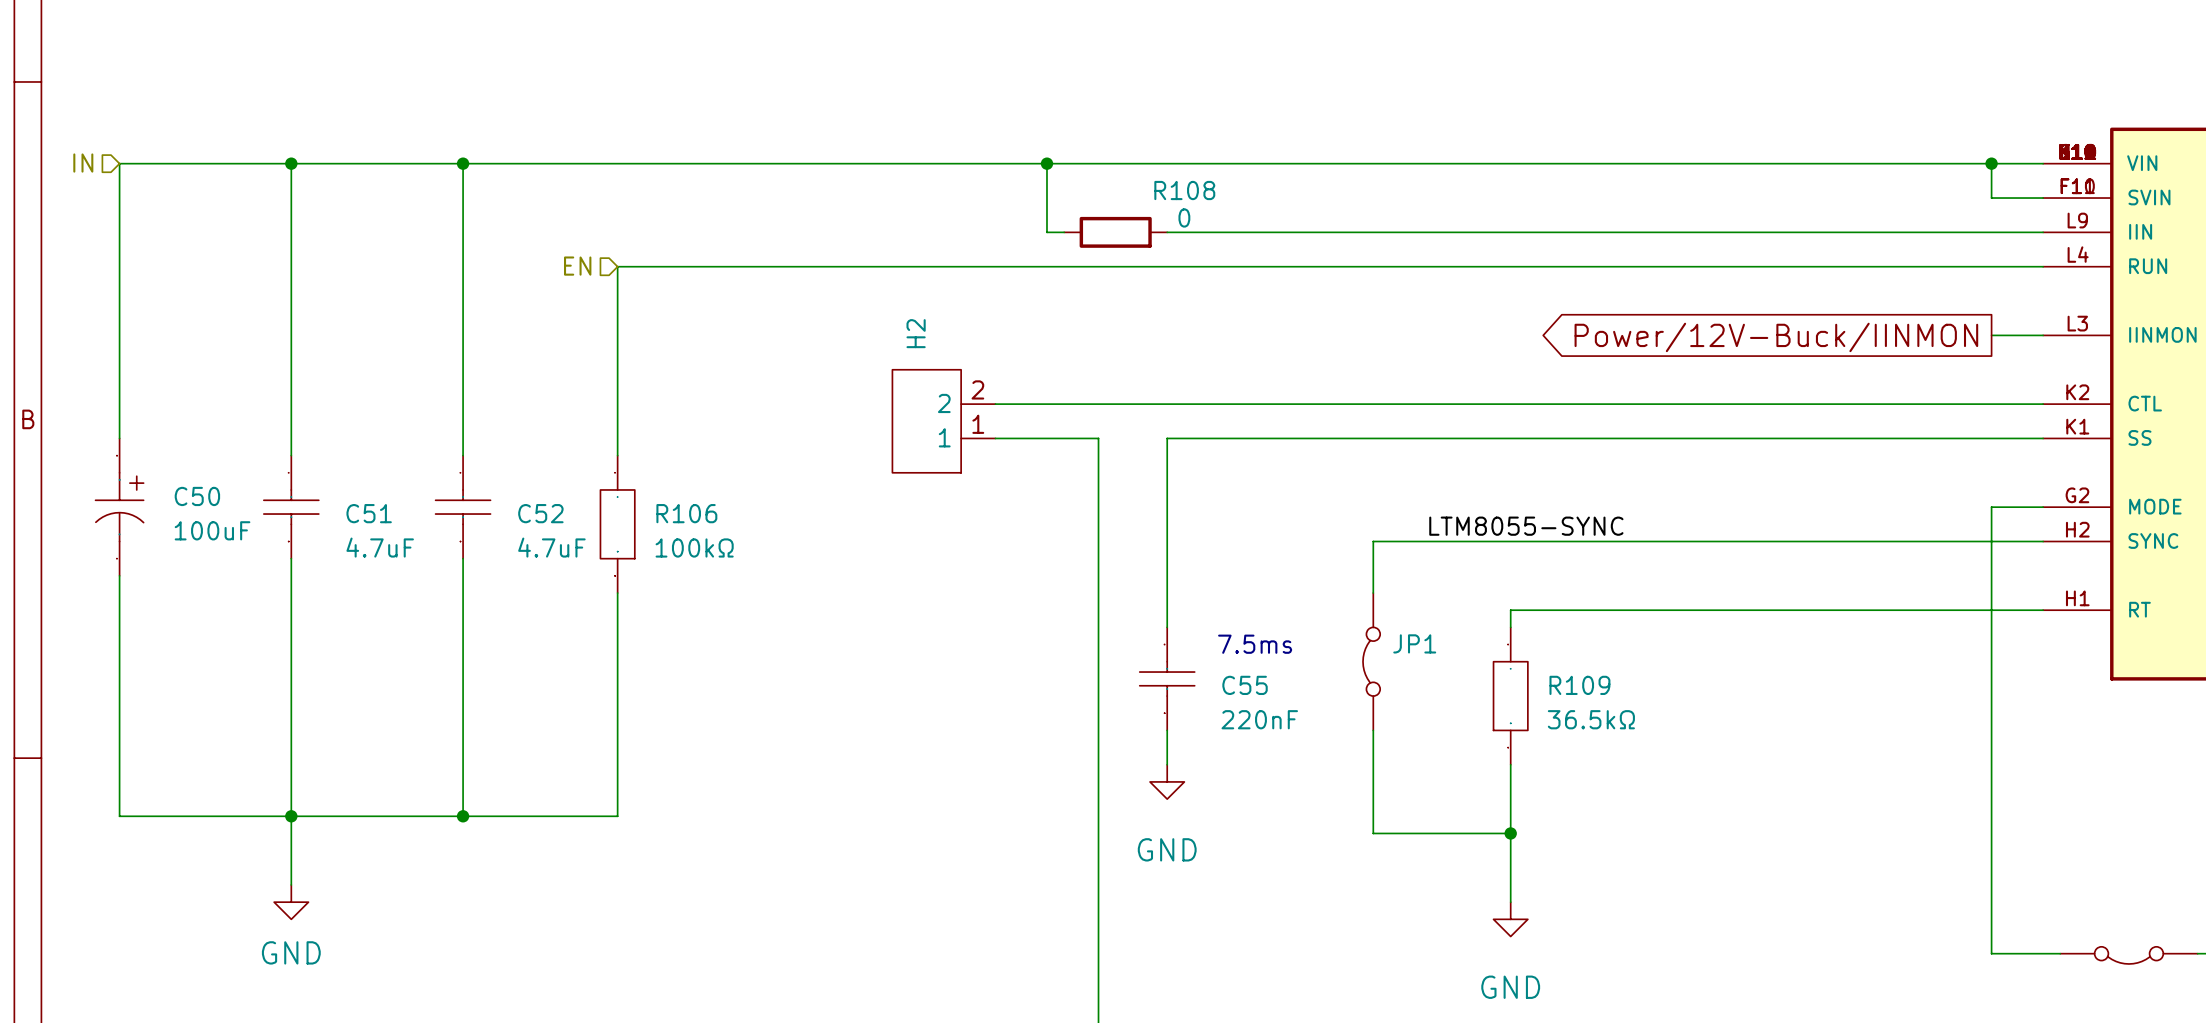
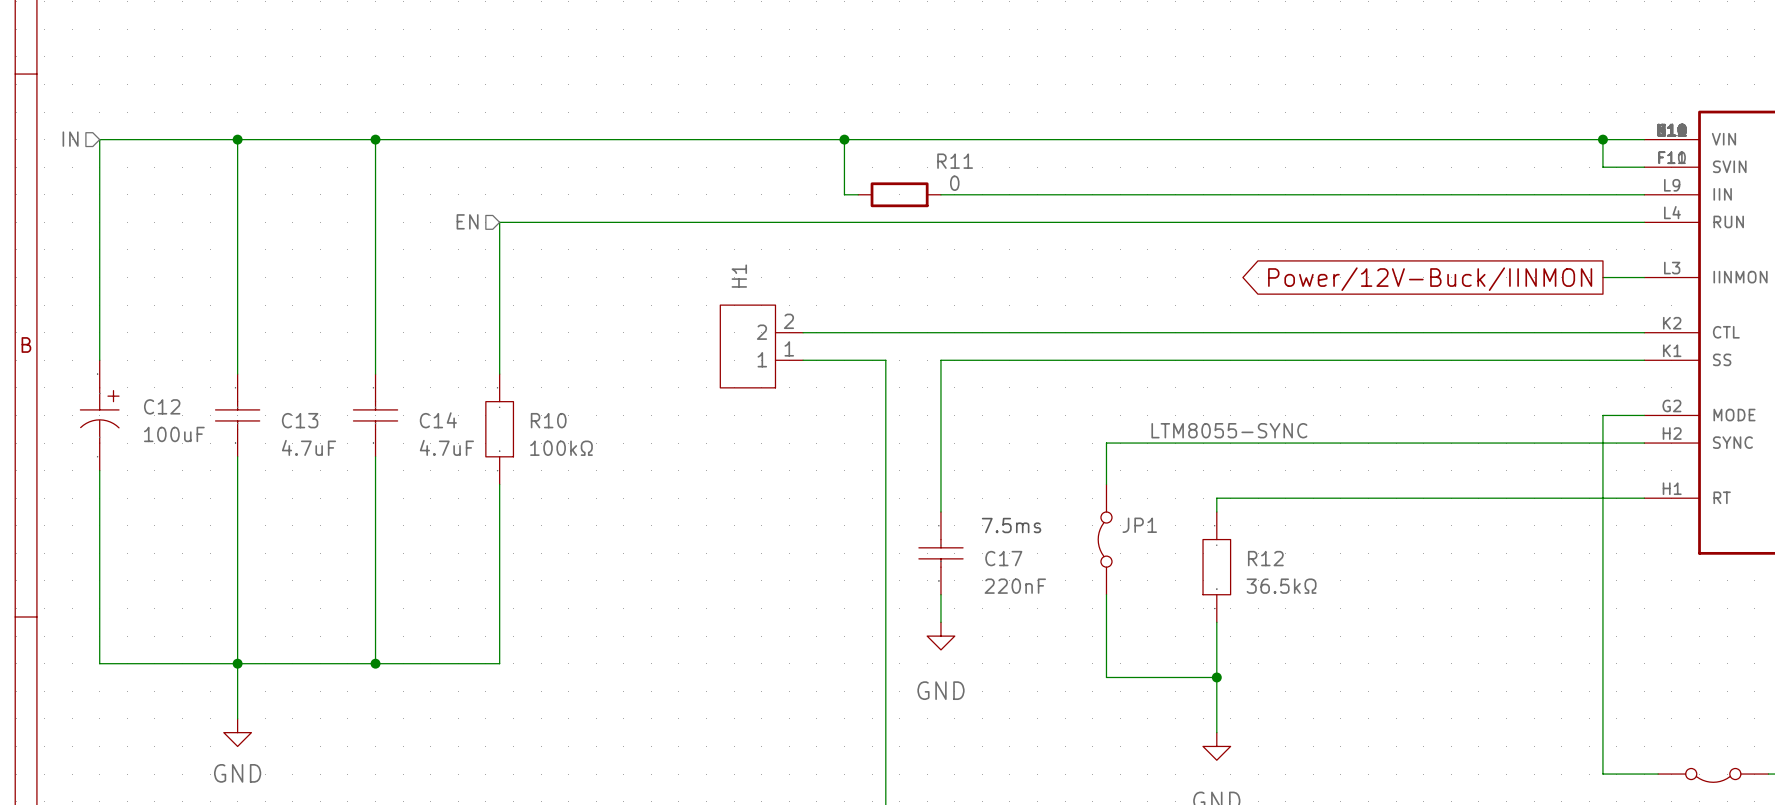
R108 name: R108 (1184, 190) -> R11 (955, 161)
H2 name: H2 (916, 333) -> H1 (739, 276)
C50 name: C50 (197, 496) -> C12 (162, 406)
C51 name: C51 (369, 513) -> C13 (300, 420)
C52 name: C52 (540, 513) -> C14 (438, 420)
R106 name: R106 (686, 513) -> R10 (548, 420)
C55 name: C55 (1245, 685) -> C17 (1003, 558)
R109 name: R109 (1579, 685) -> R12 (1265, 558)

